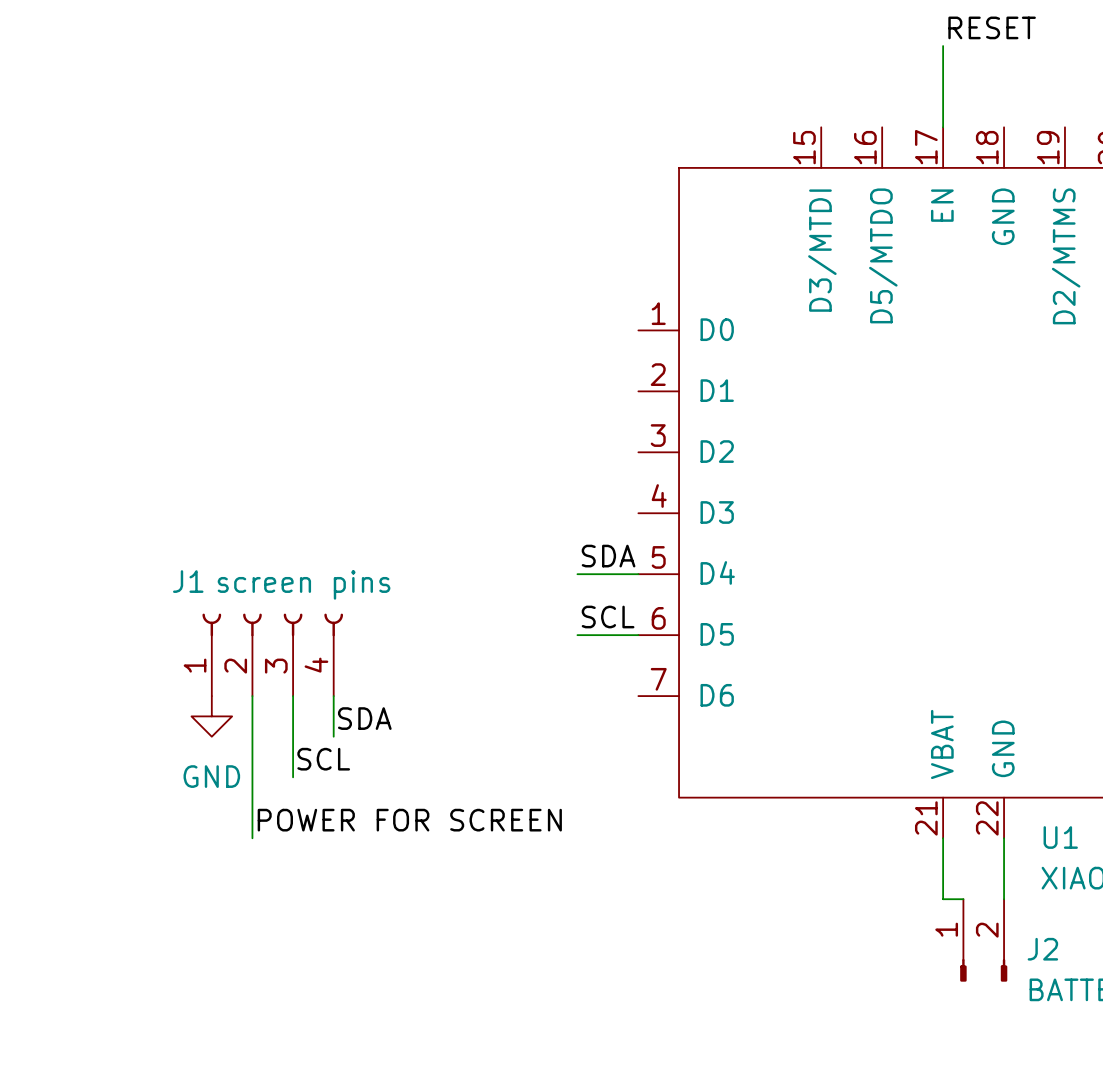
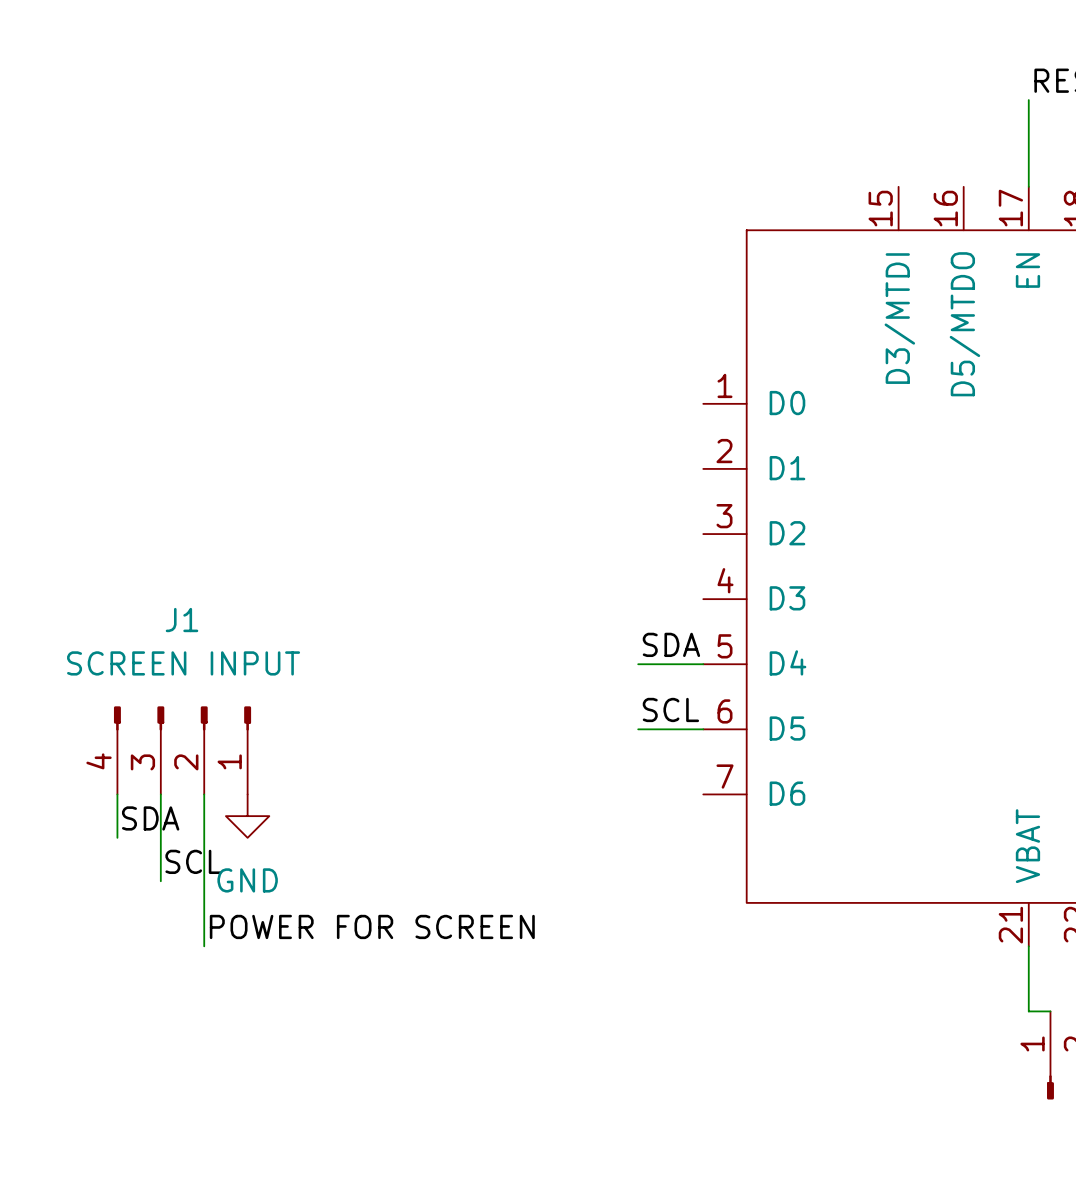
J1 name position: J1 (188, 581) -> J1 (182, 620)
J1 value: screen pins (304, 584) -> SCREEN INPUT (183, 663)
J1 symbol: [202, 613, 344, 697] -> [113, 706, 252, 795]
wire: (252, 696) (252, 838) -> (204, 794) (204, 946)
wire: (293, 696) (293, 777) -> (160, 794) (160, 881)
wire: (333, 696) (333, 736) -> (117, 794) (117, 837)
label position: SDA (364, 718) -> SDA (150, 818)
label position: SCL (323, 759) -> SCL (193, 861)
label position: POWER FOR SCREEN (409, 820) -> POWER FOR SCREEN (372, 926)

